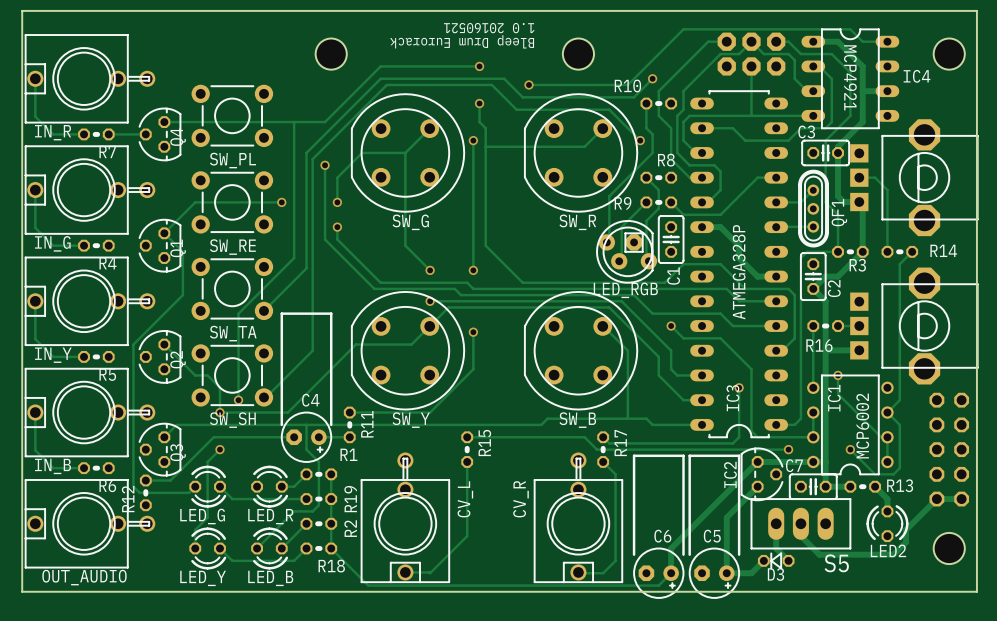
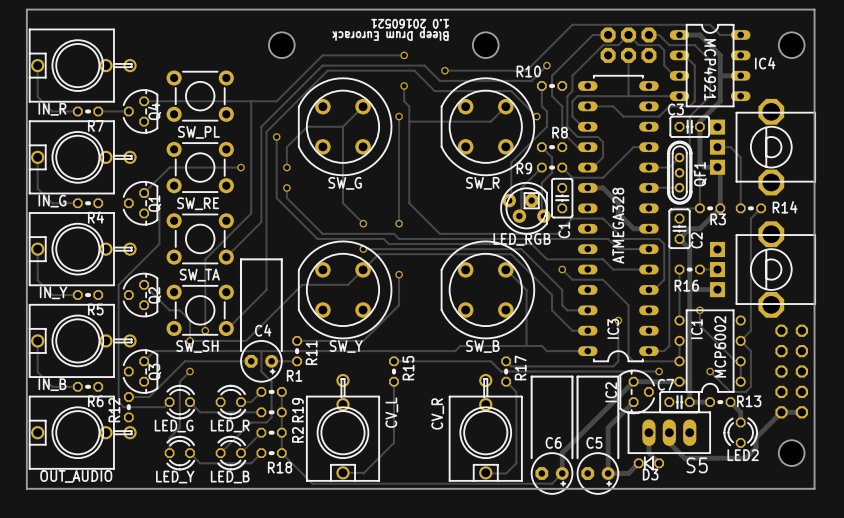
IC3 value: ATMEGA328P (739, 272) -> ATMEGA328 (618, 225)

